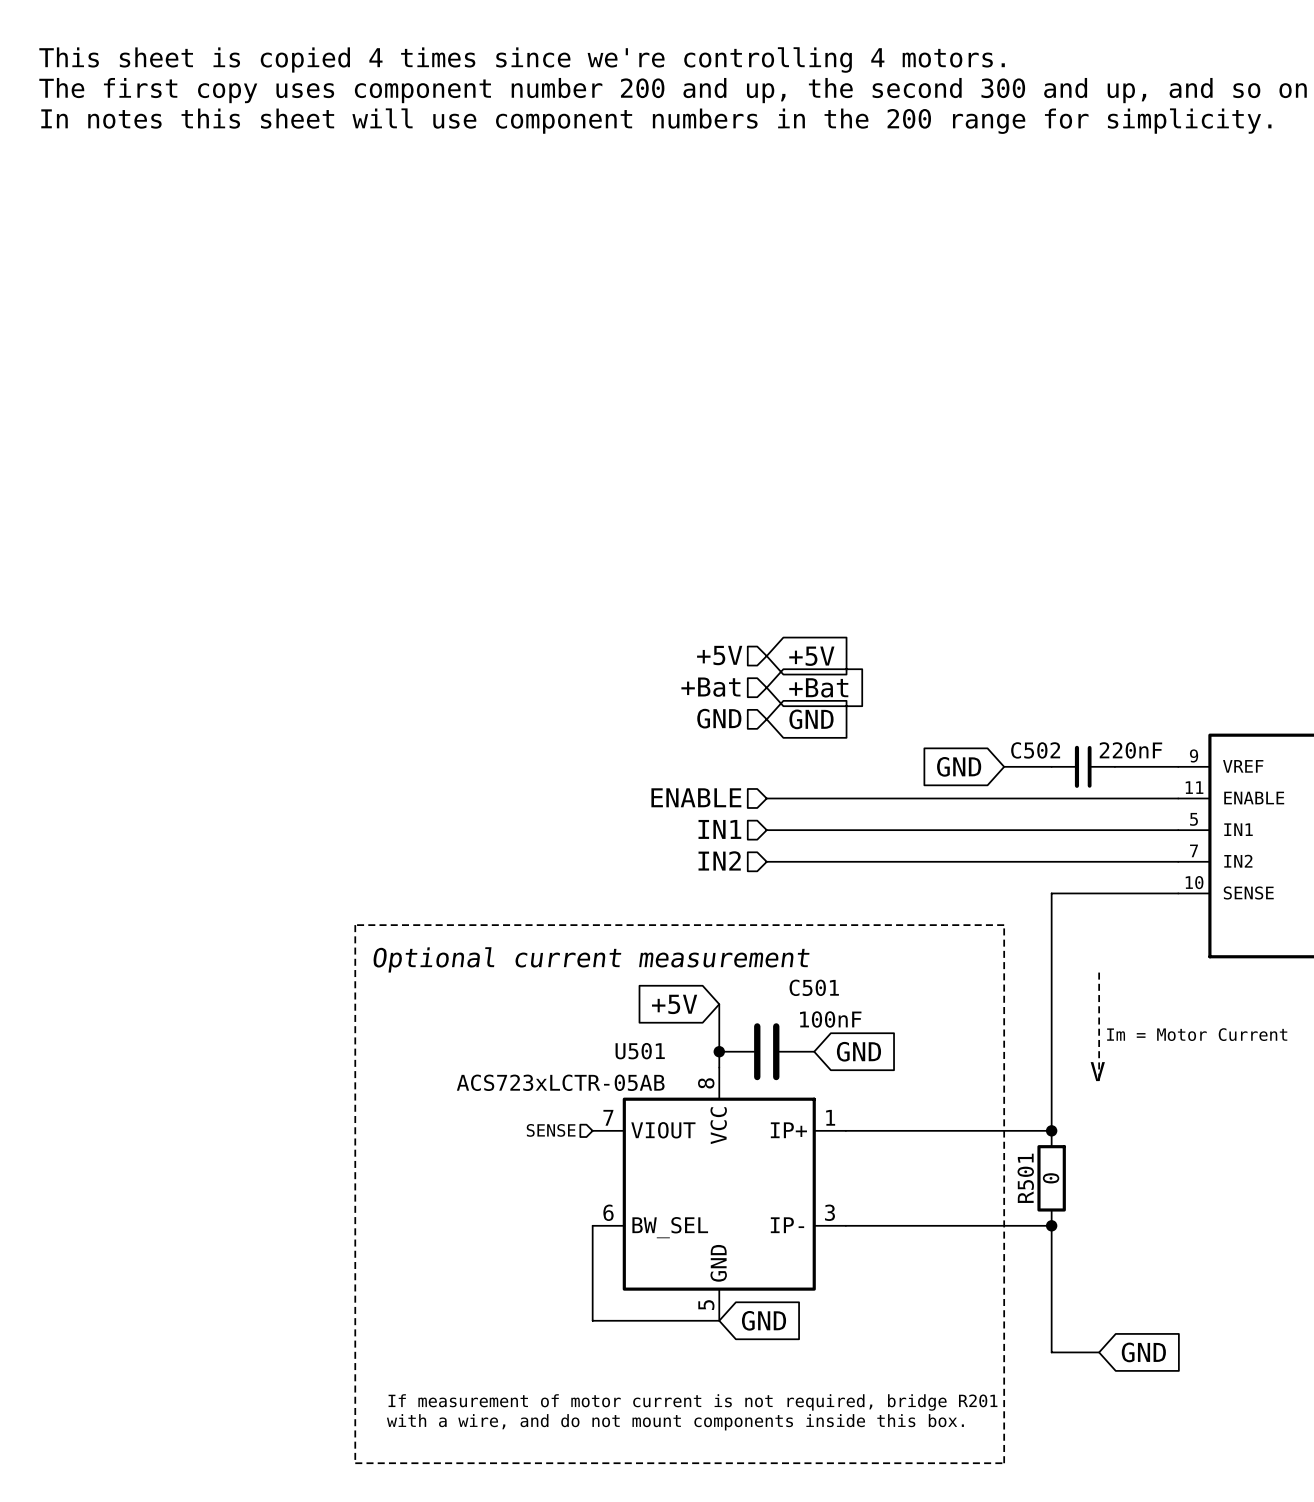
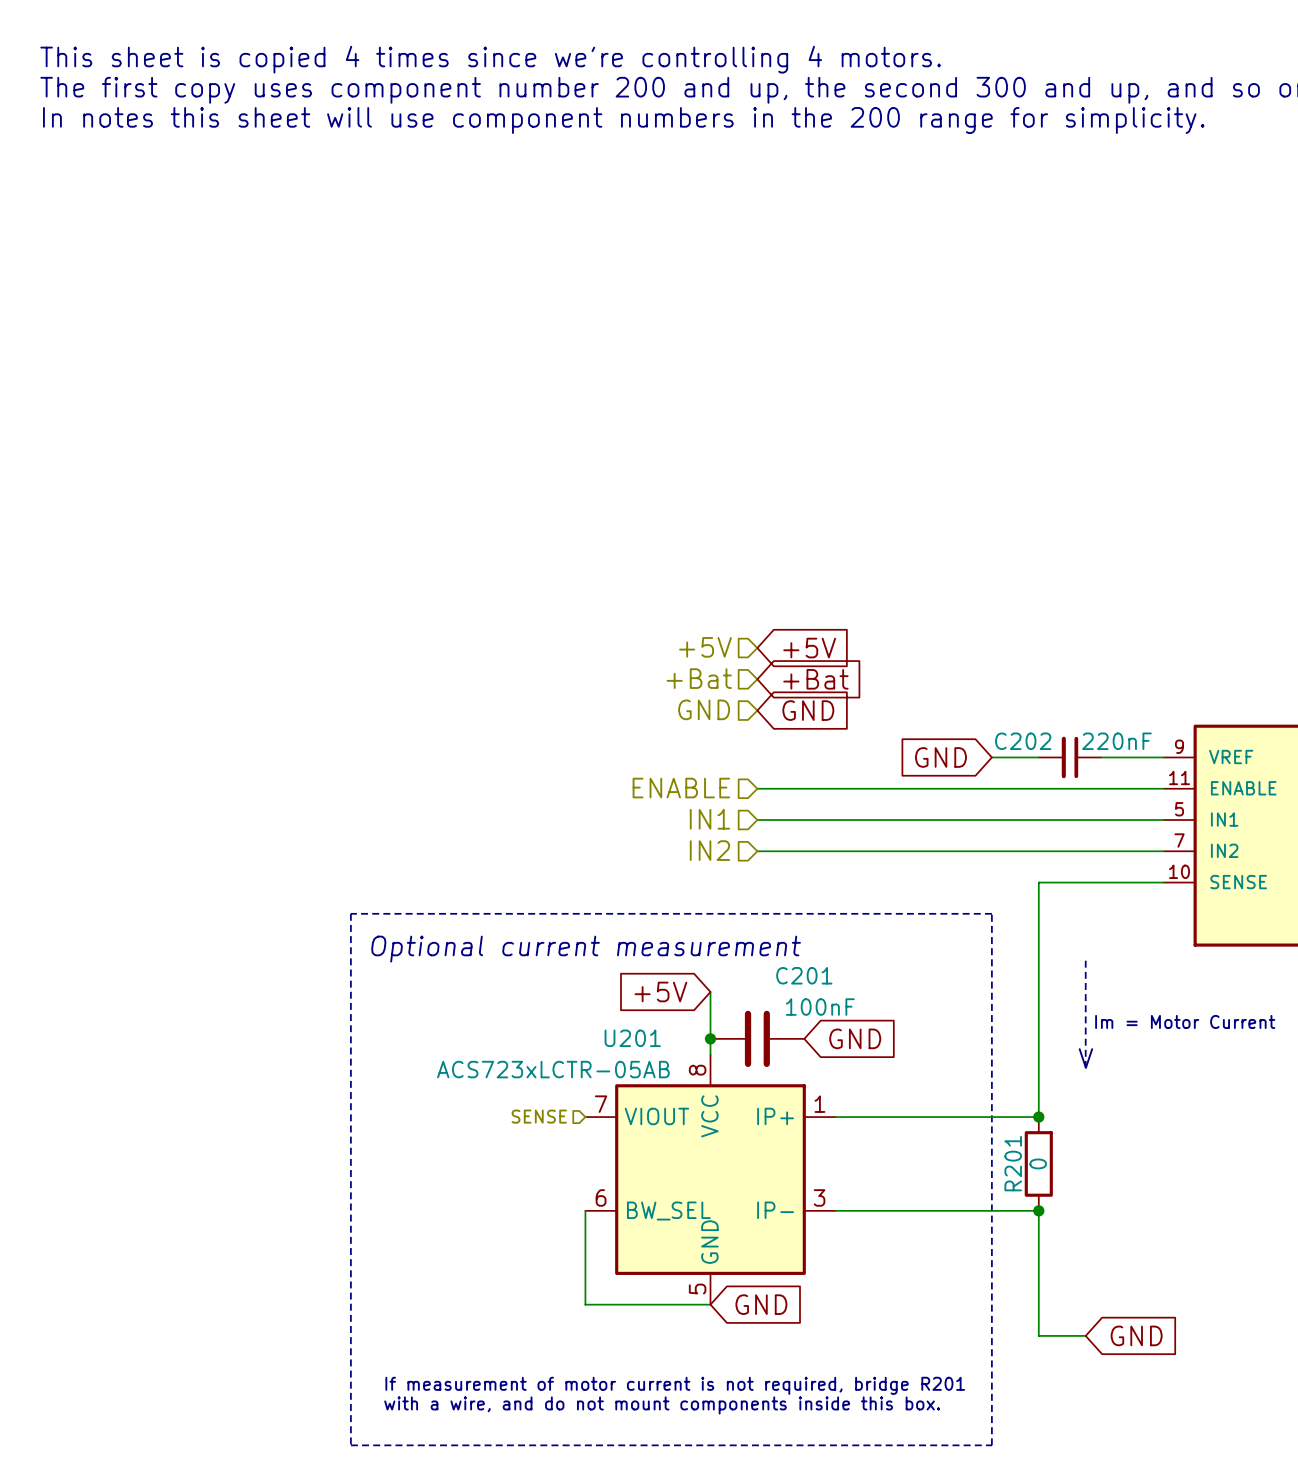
C502 name: C502 (1035, 750) -> C202 (1023, 741)
C501 name: C501 (814, 987) -> C201 (804, 975)
U501 name: U501 (640, 1051) -> U201 (632, 1038)
R501 name: R501 (1025, 1178) -> R201 (1013, 1163)

